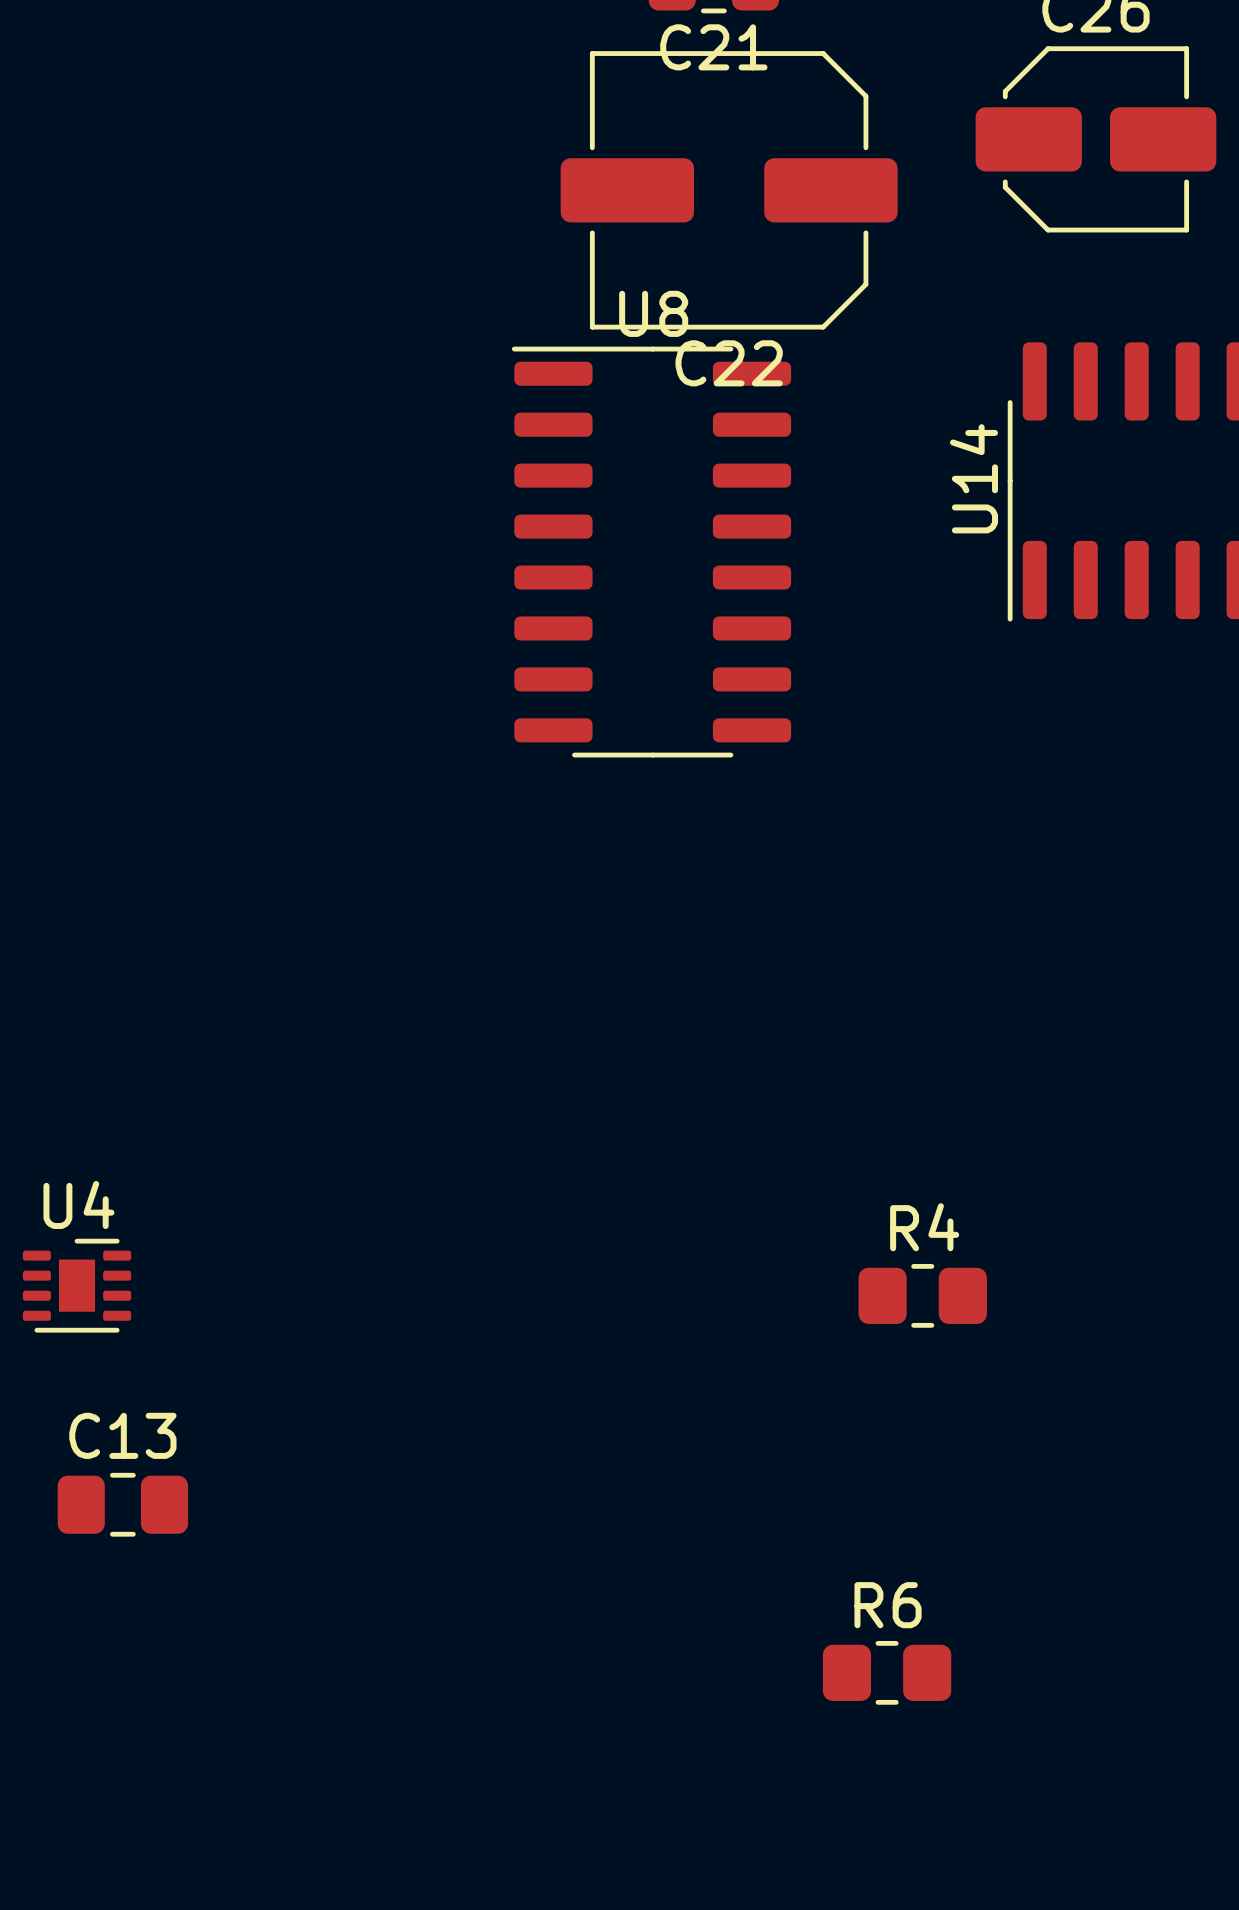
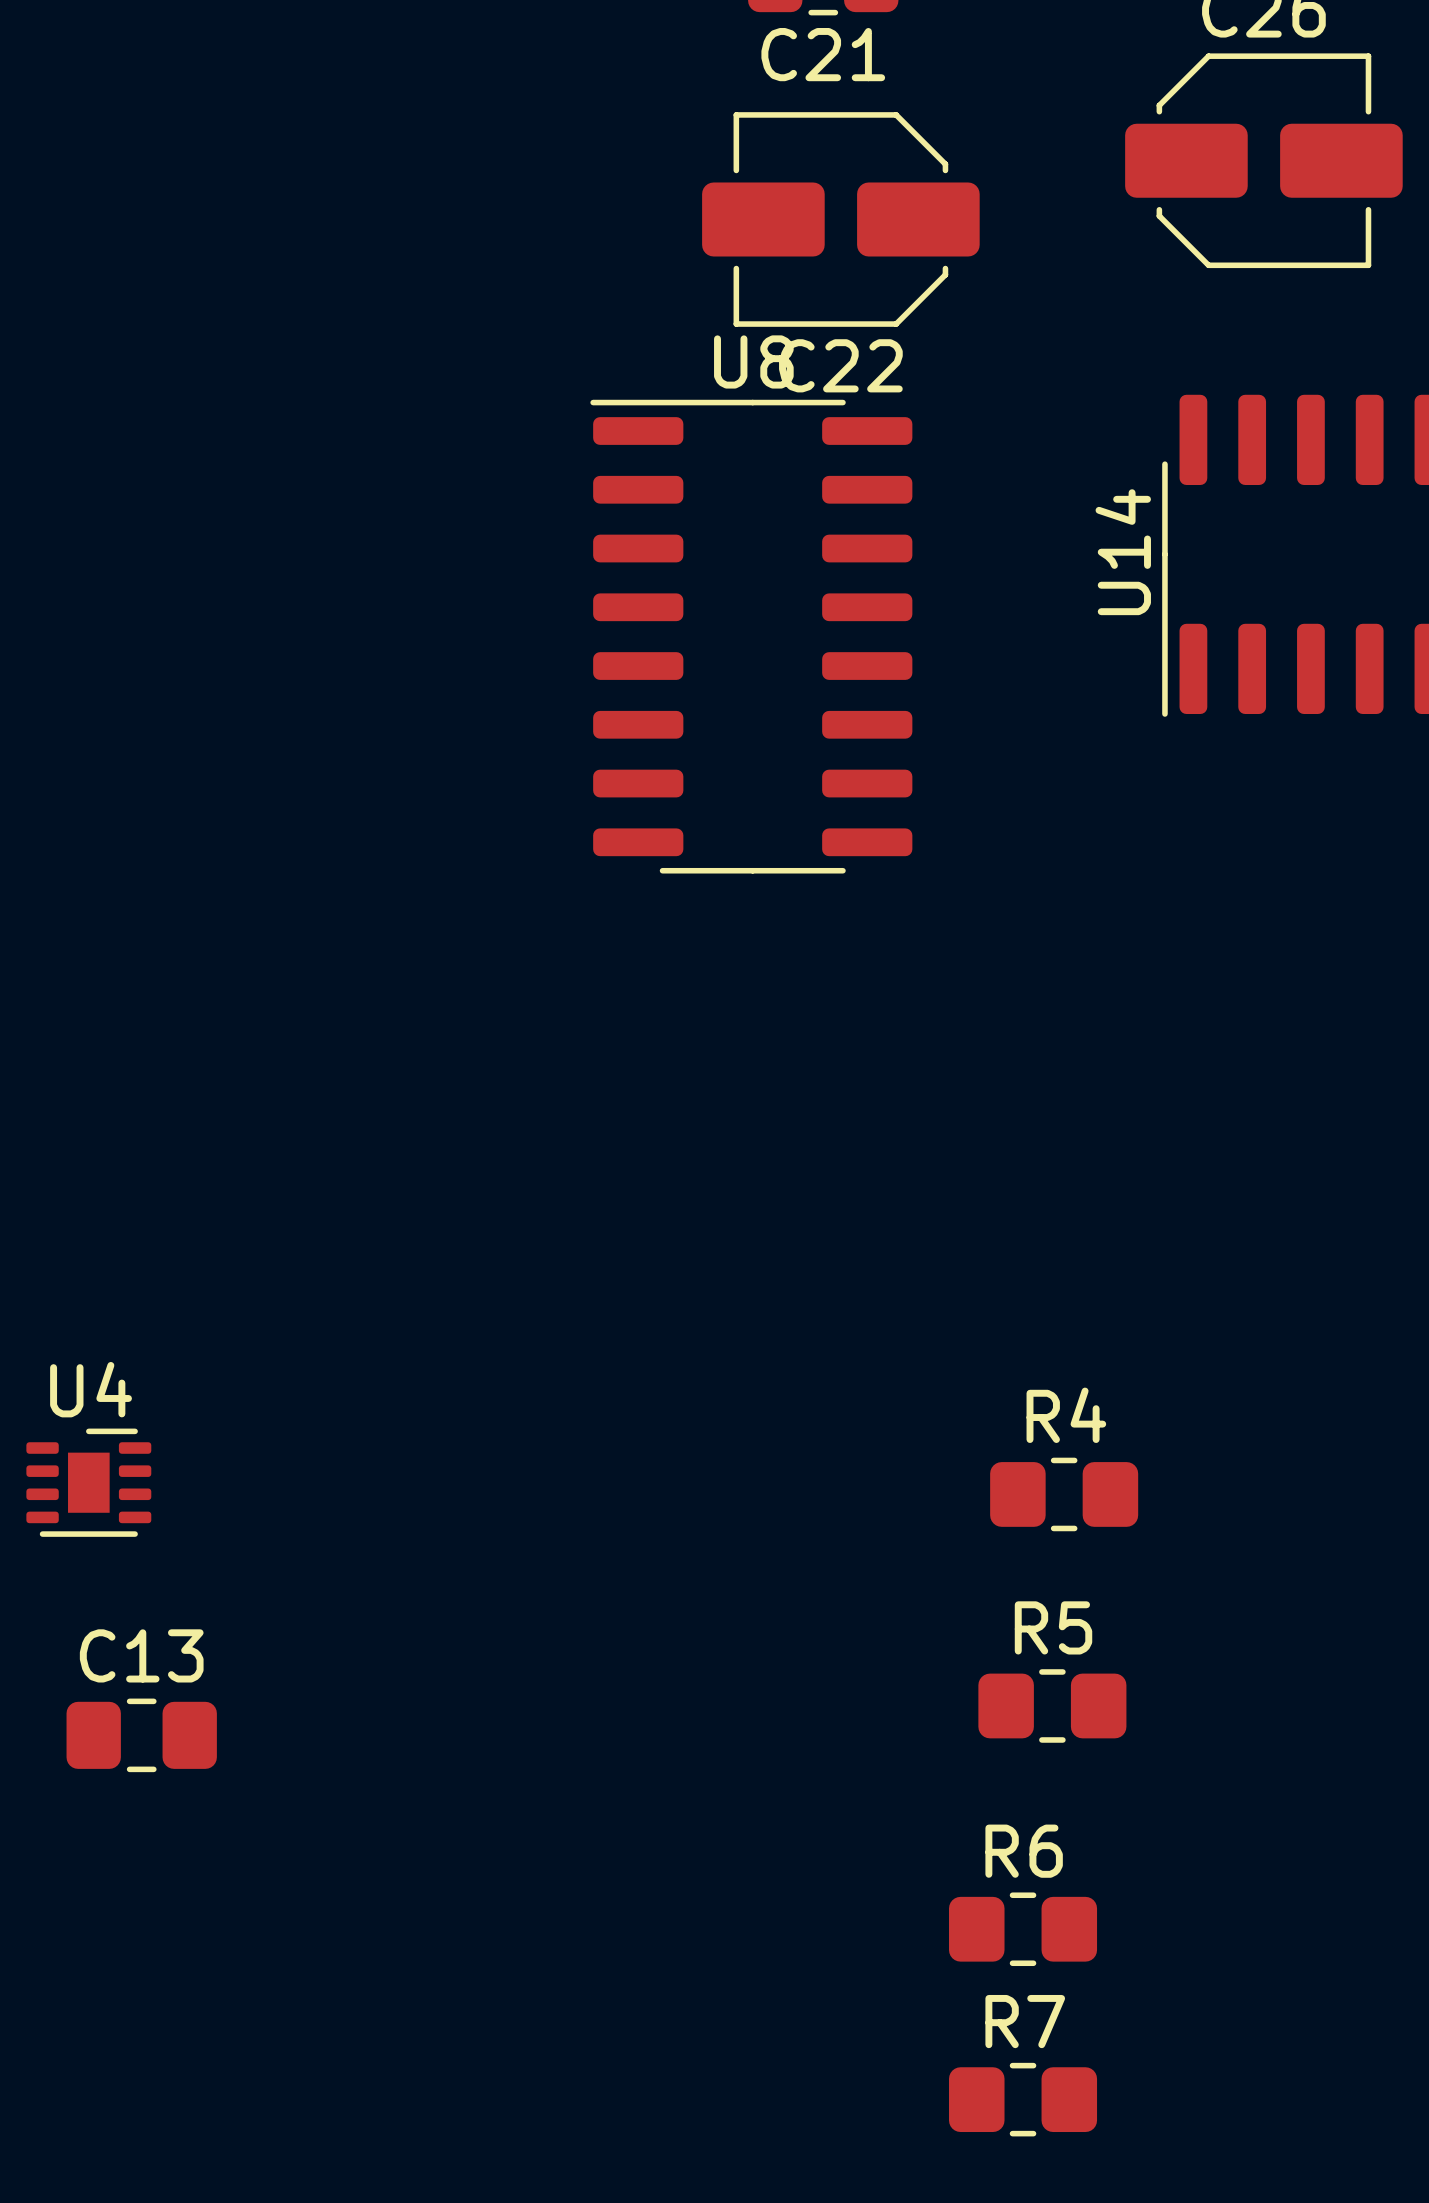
C22 footprint: [560, 51, 898, 330] -> [702, 112, 980, 327]
R5: none -> (1052, 1705)
R7: none -> (1023, 2099)

